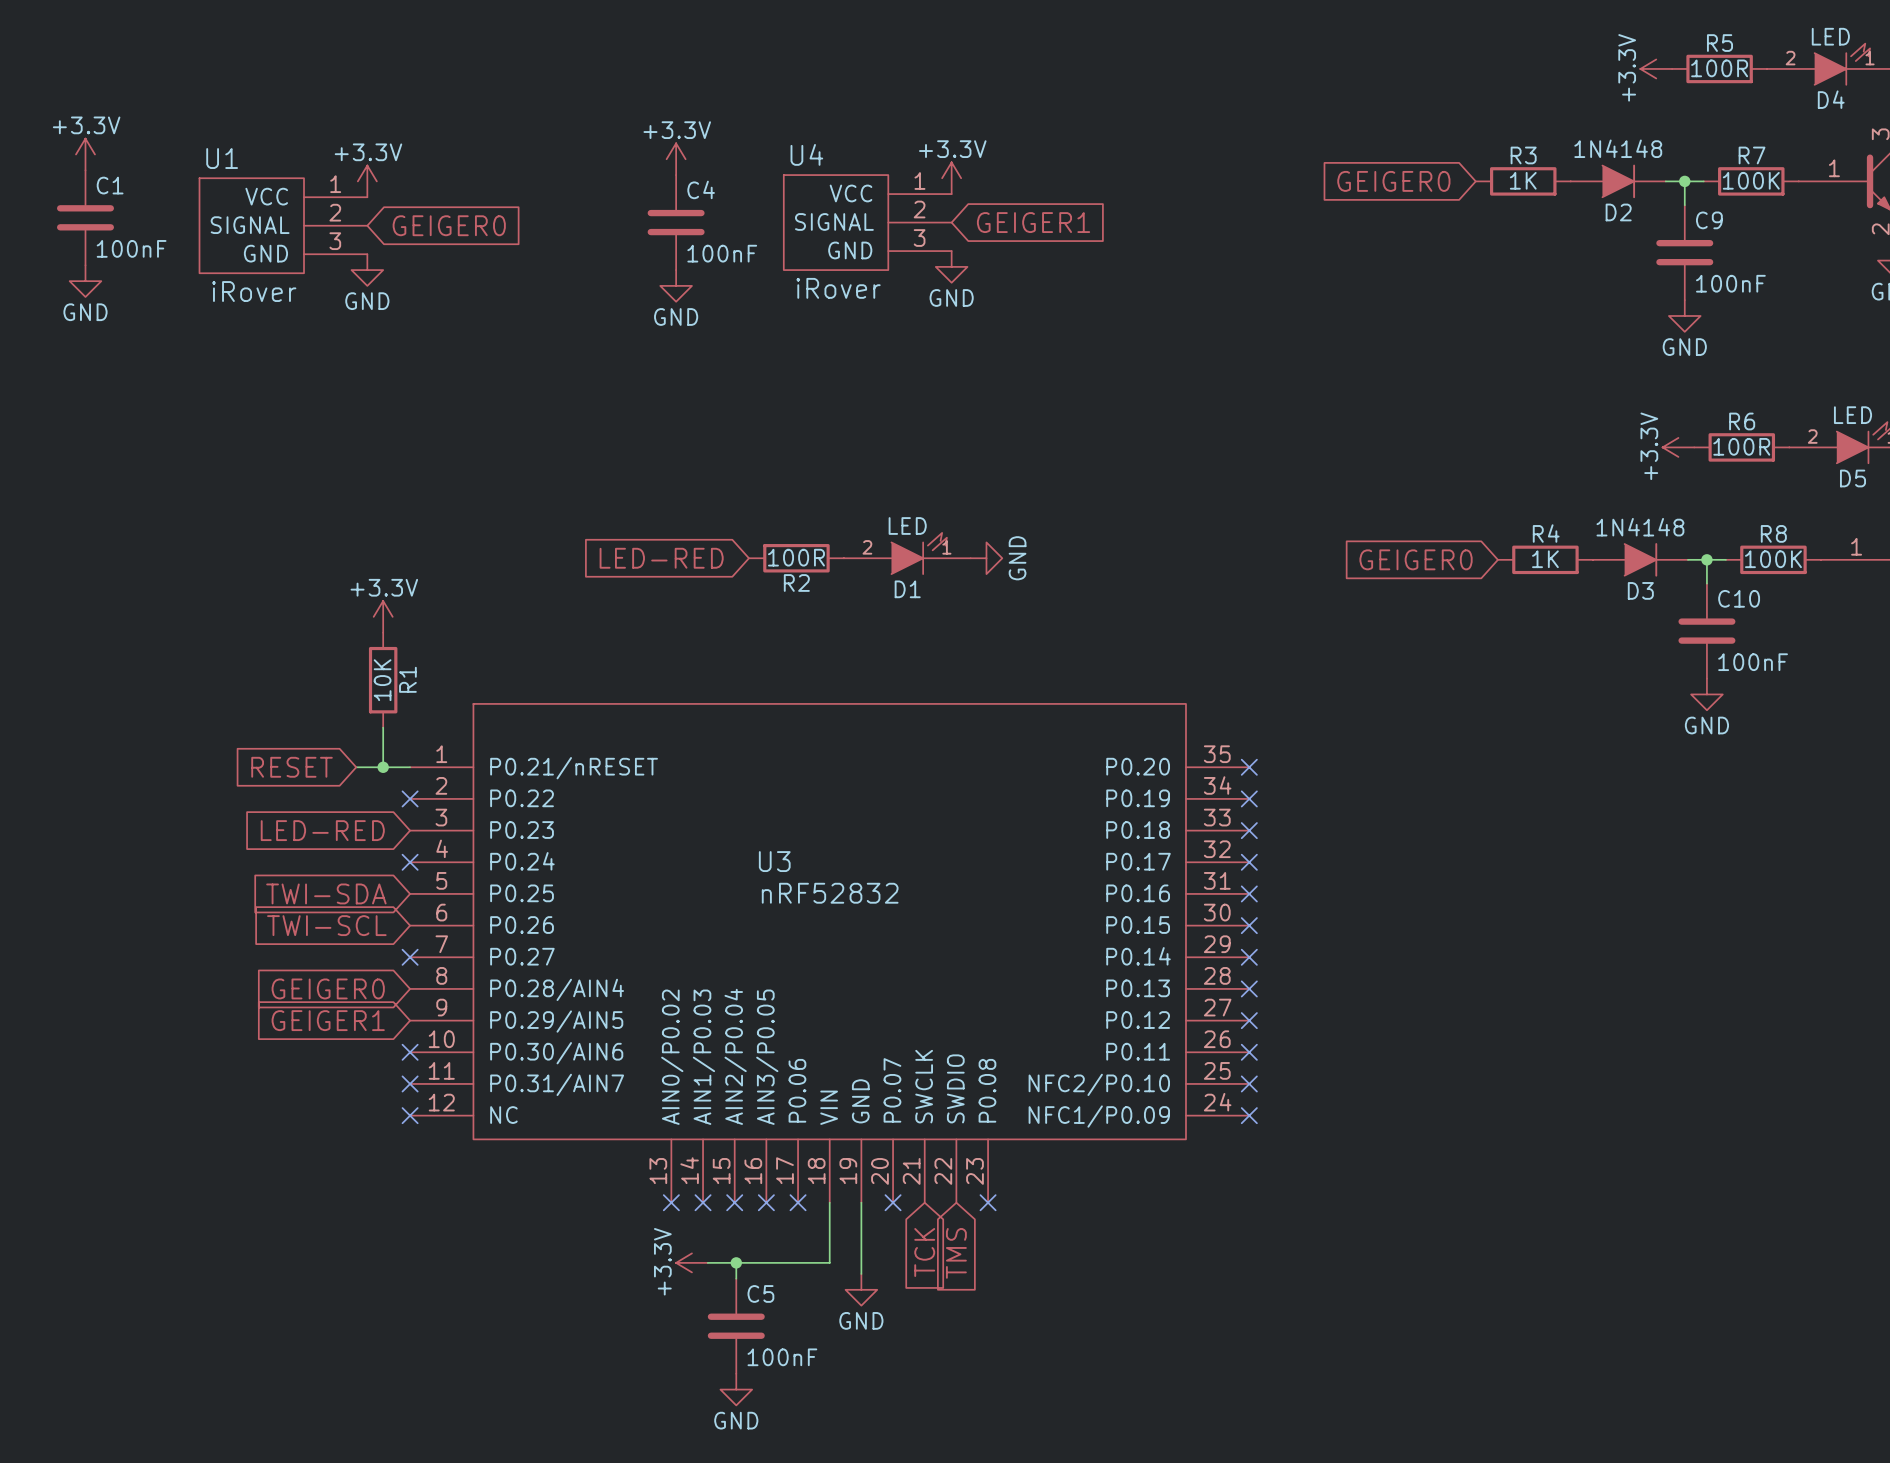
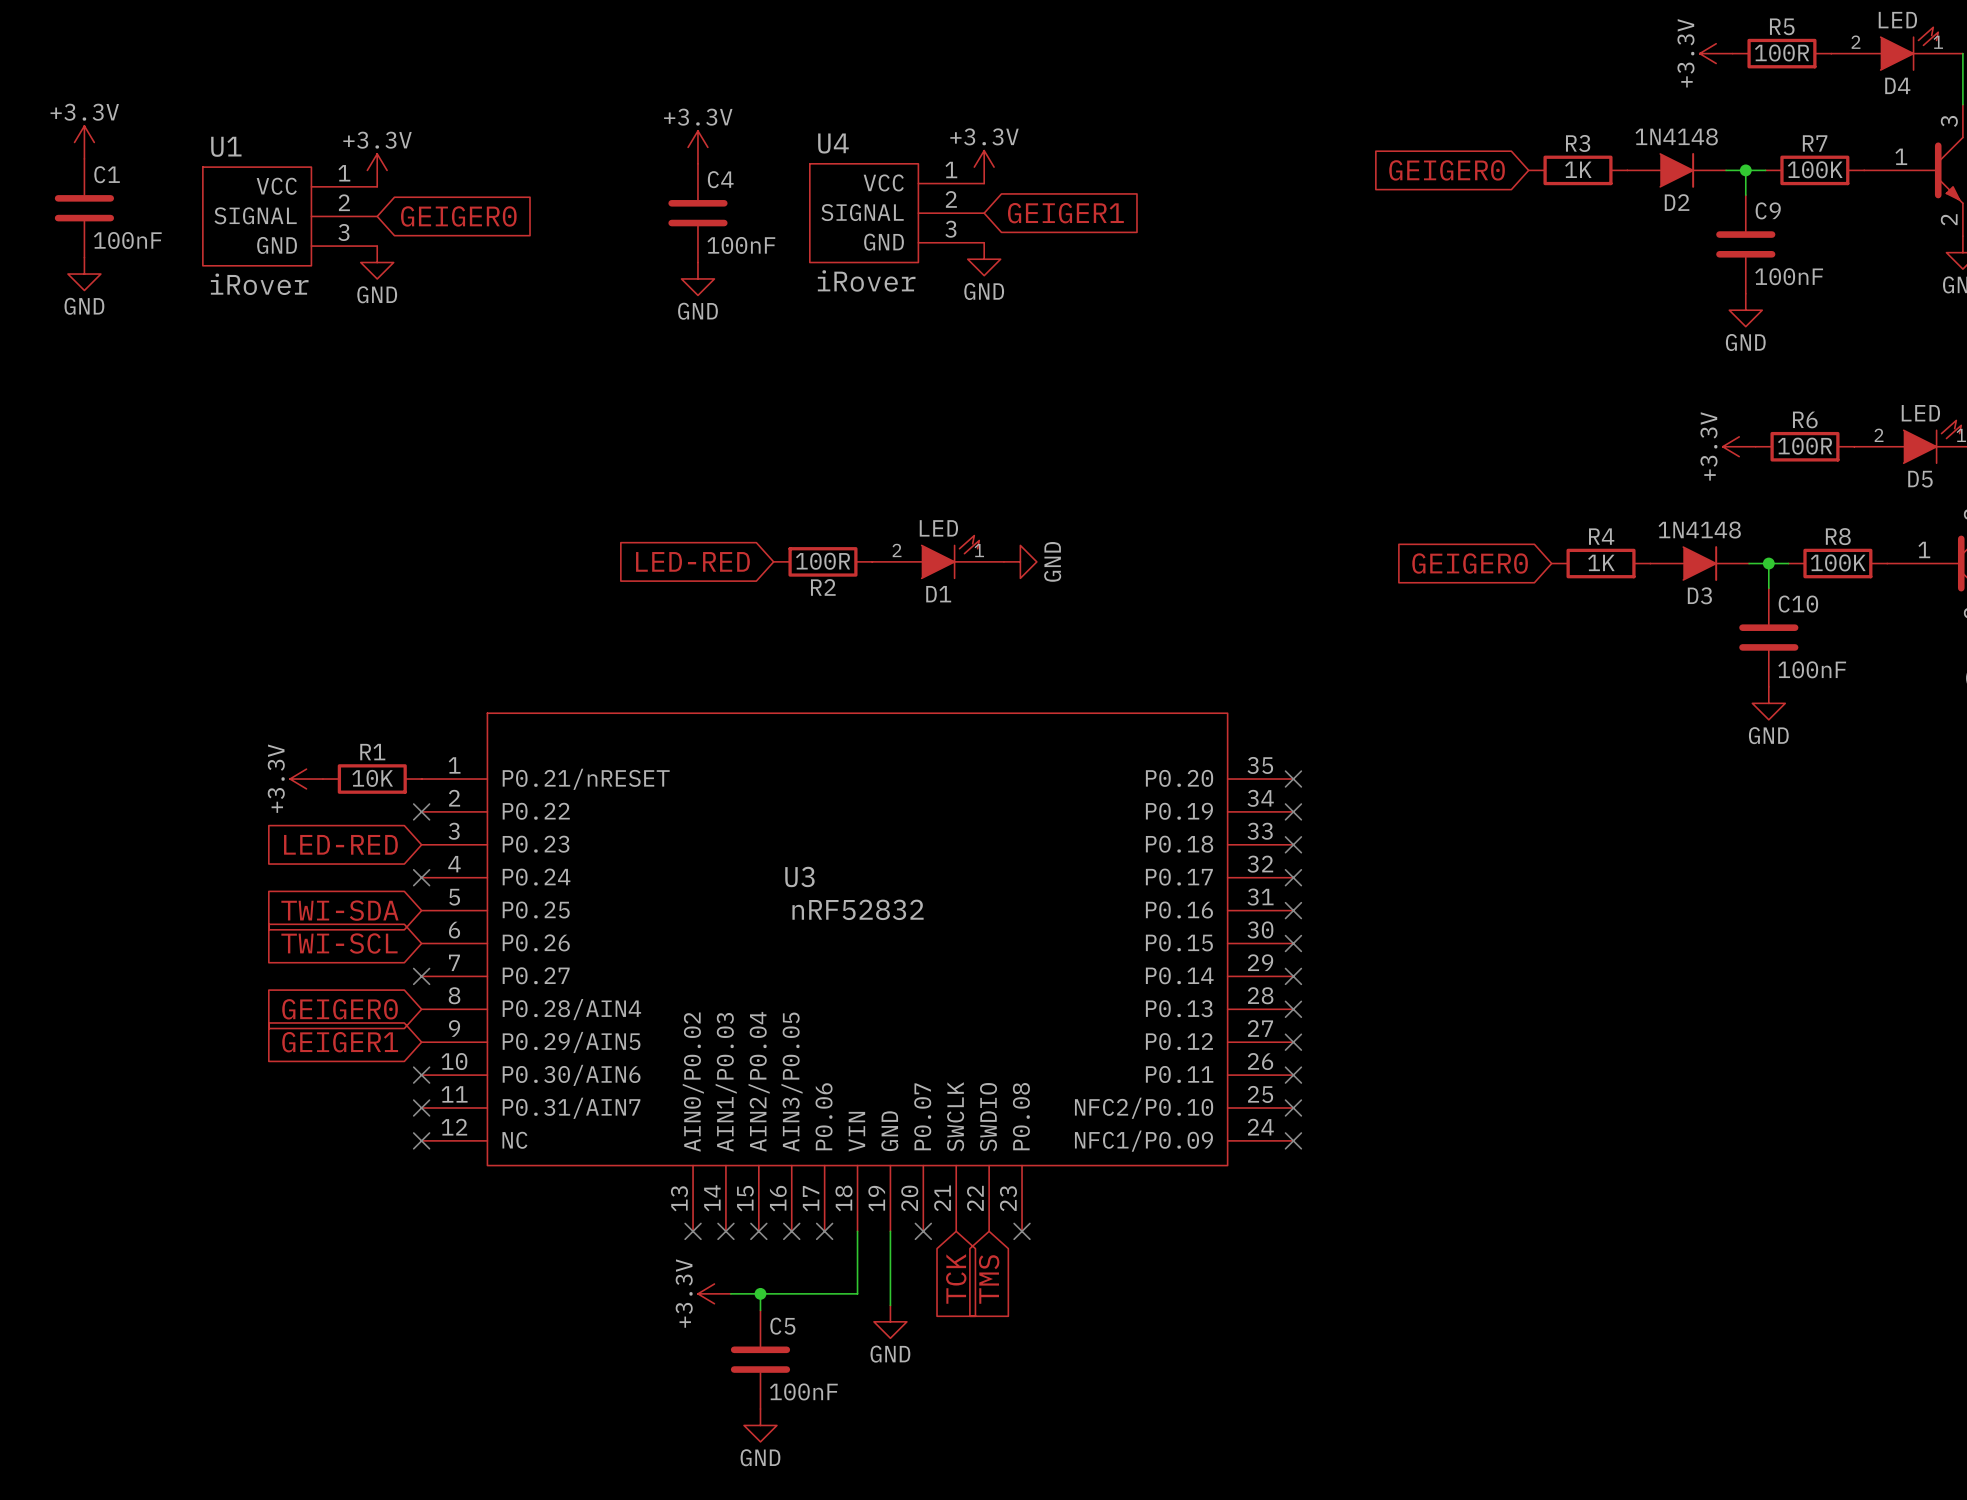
power symbol rotation: 0° (383, 616) -> 90° counterclockwise (306, 779)
power symbol position: +3.3V (383, 616) -> +3.3V (306, 779)
R1 name position: R1 (407, 679) -> R1 (372, 752)
R1 rotation: 0° (383, 680) -> 90° clockwise (372, 779)
R1 position: (383, 680) -> (372, 779)
wire: (383, 727) (383, 767) -> none
global label: RESET (292, 767) -> none
wire: (356, 767) (410, 767) -> none
junction: (383, 767) -> none

